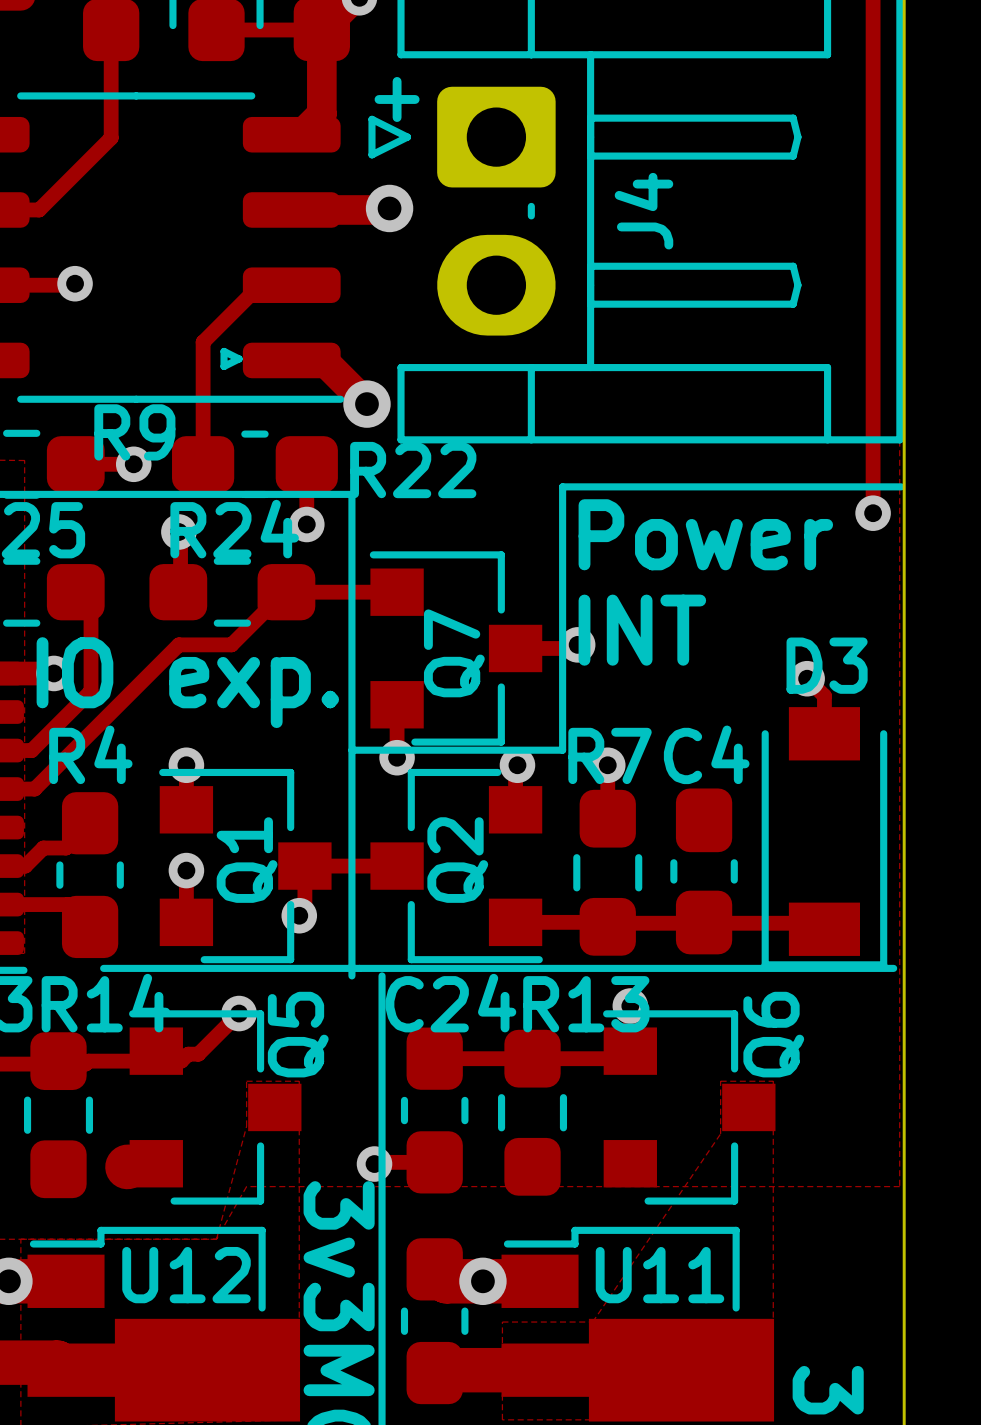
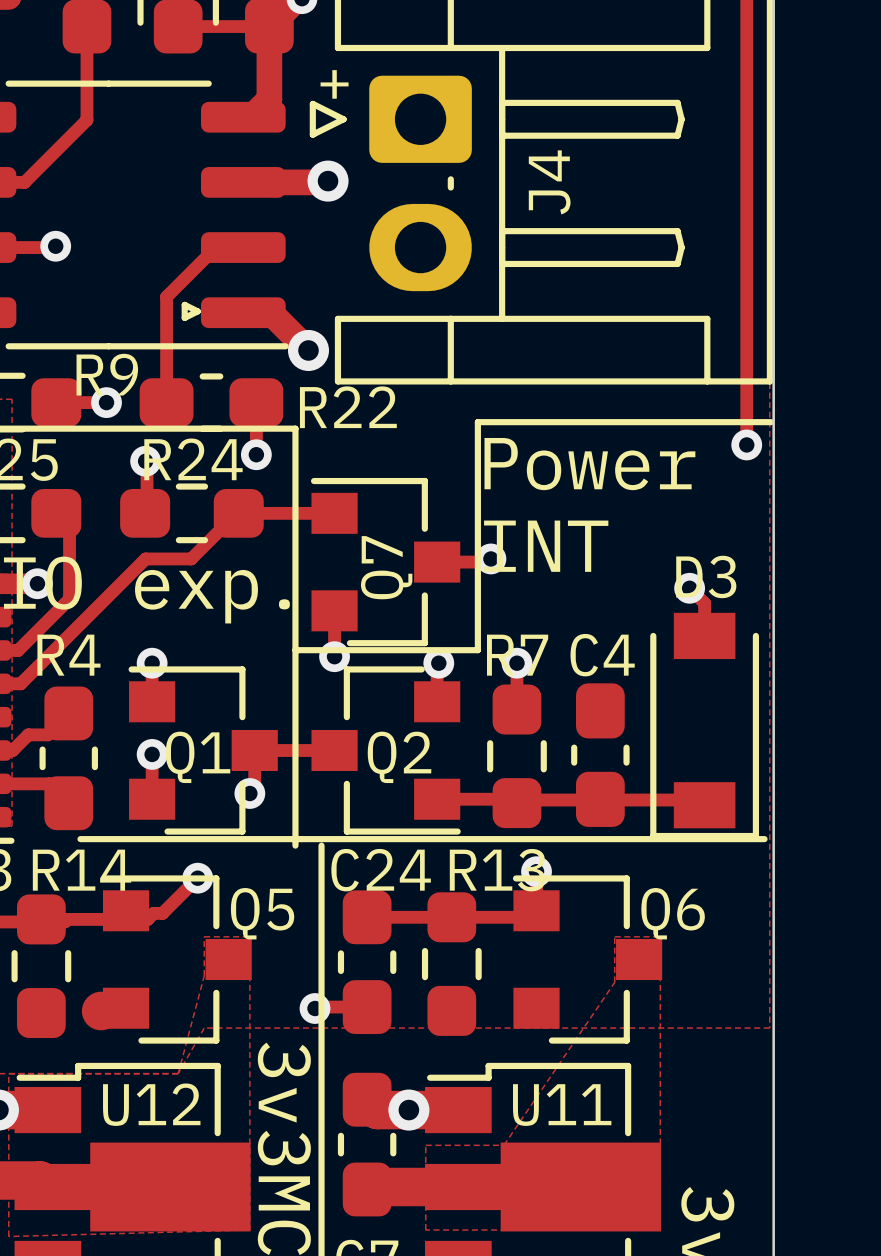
Q1 name rotation: 0° (247, 860) -> 90° clockwise (198, 757)
Q2 name rotation: 0° (457, 860) -> 90° clockwise (399, 757)
Q5 name rotation: 0° (298, 1034) -> 90° clockwise (262, 913)
Q6 name rotation: 0° (773, 1034) -> 90° clockwise (673, 913)

